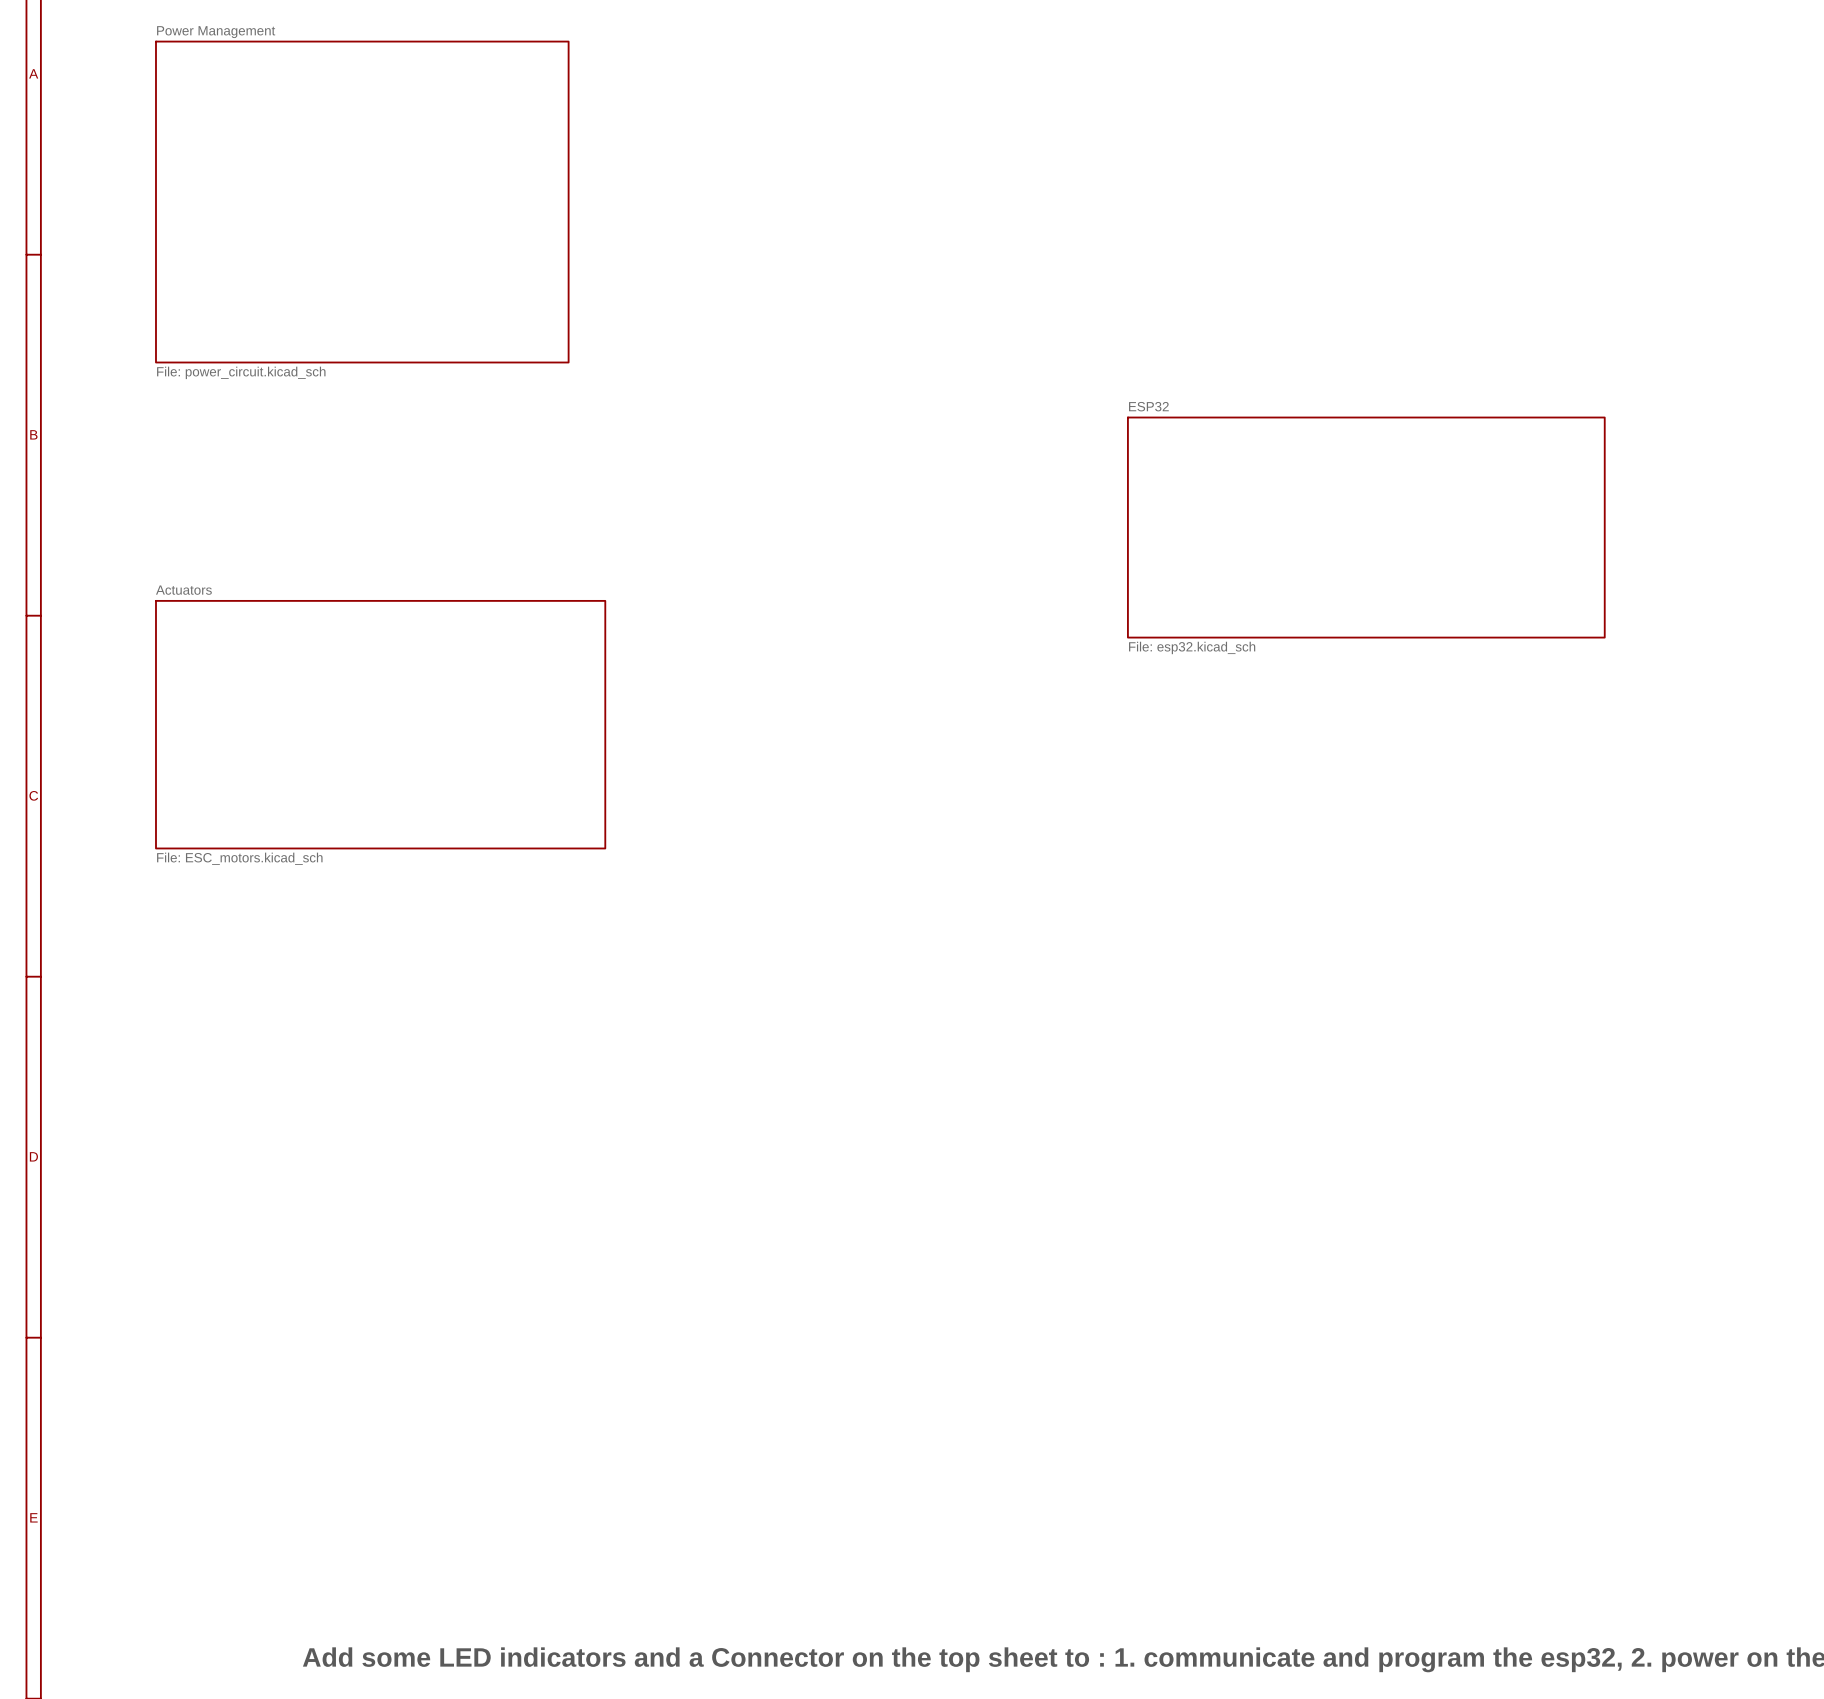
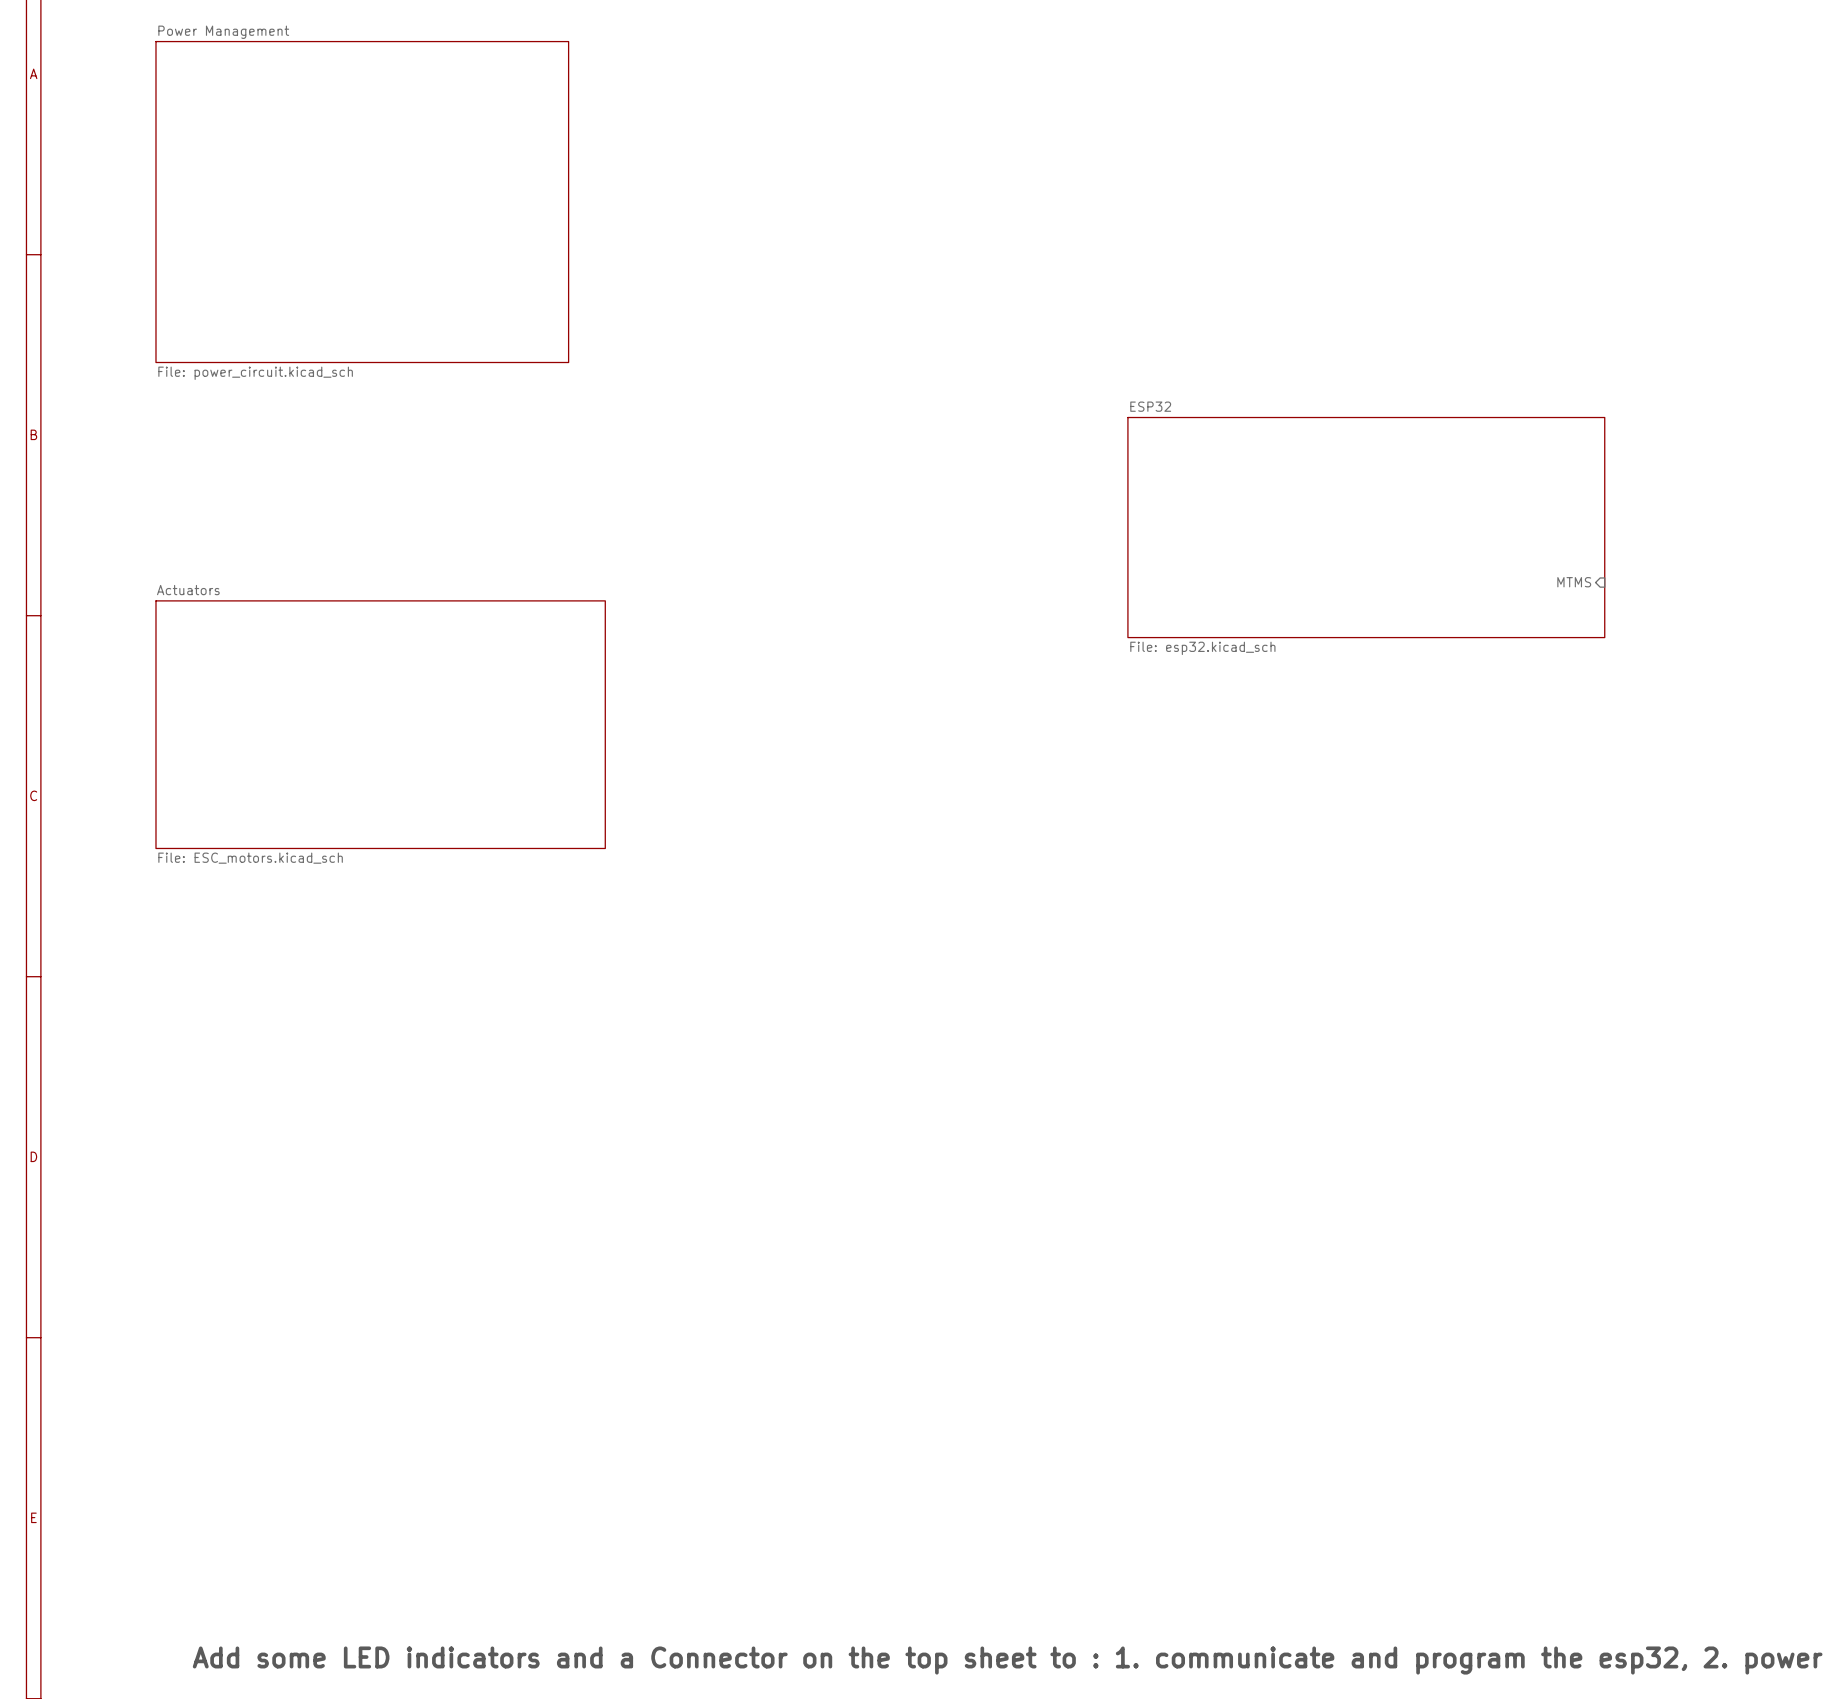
sheet pin: none -> MTMS (1574, 582)

